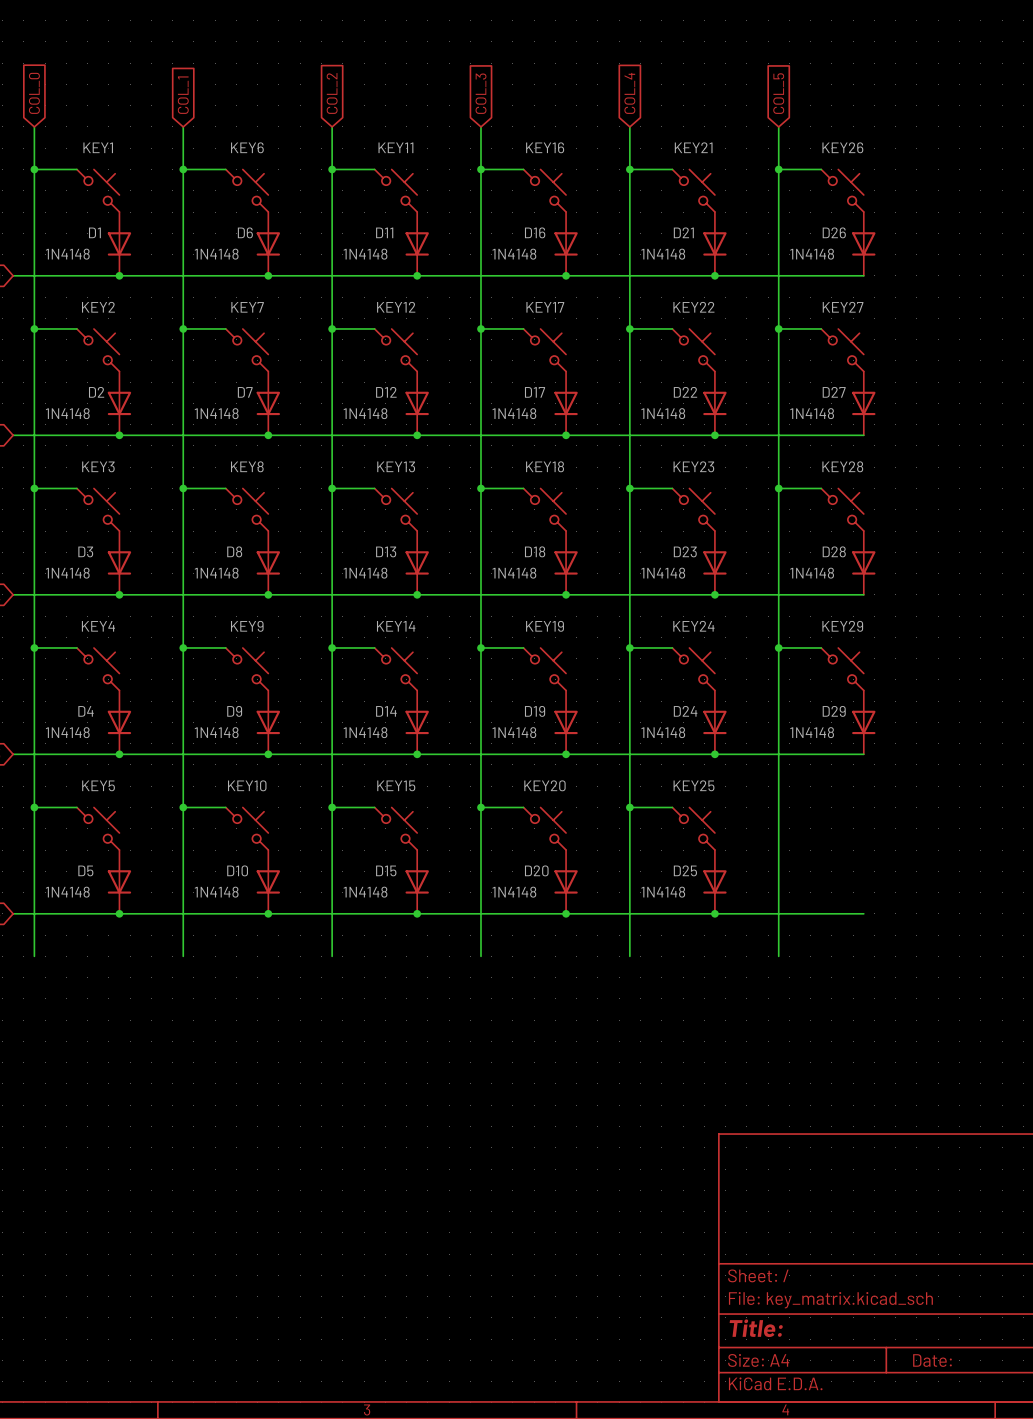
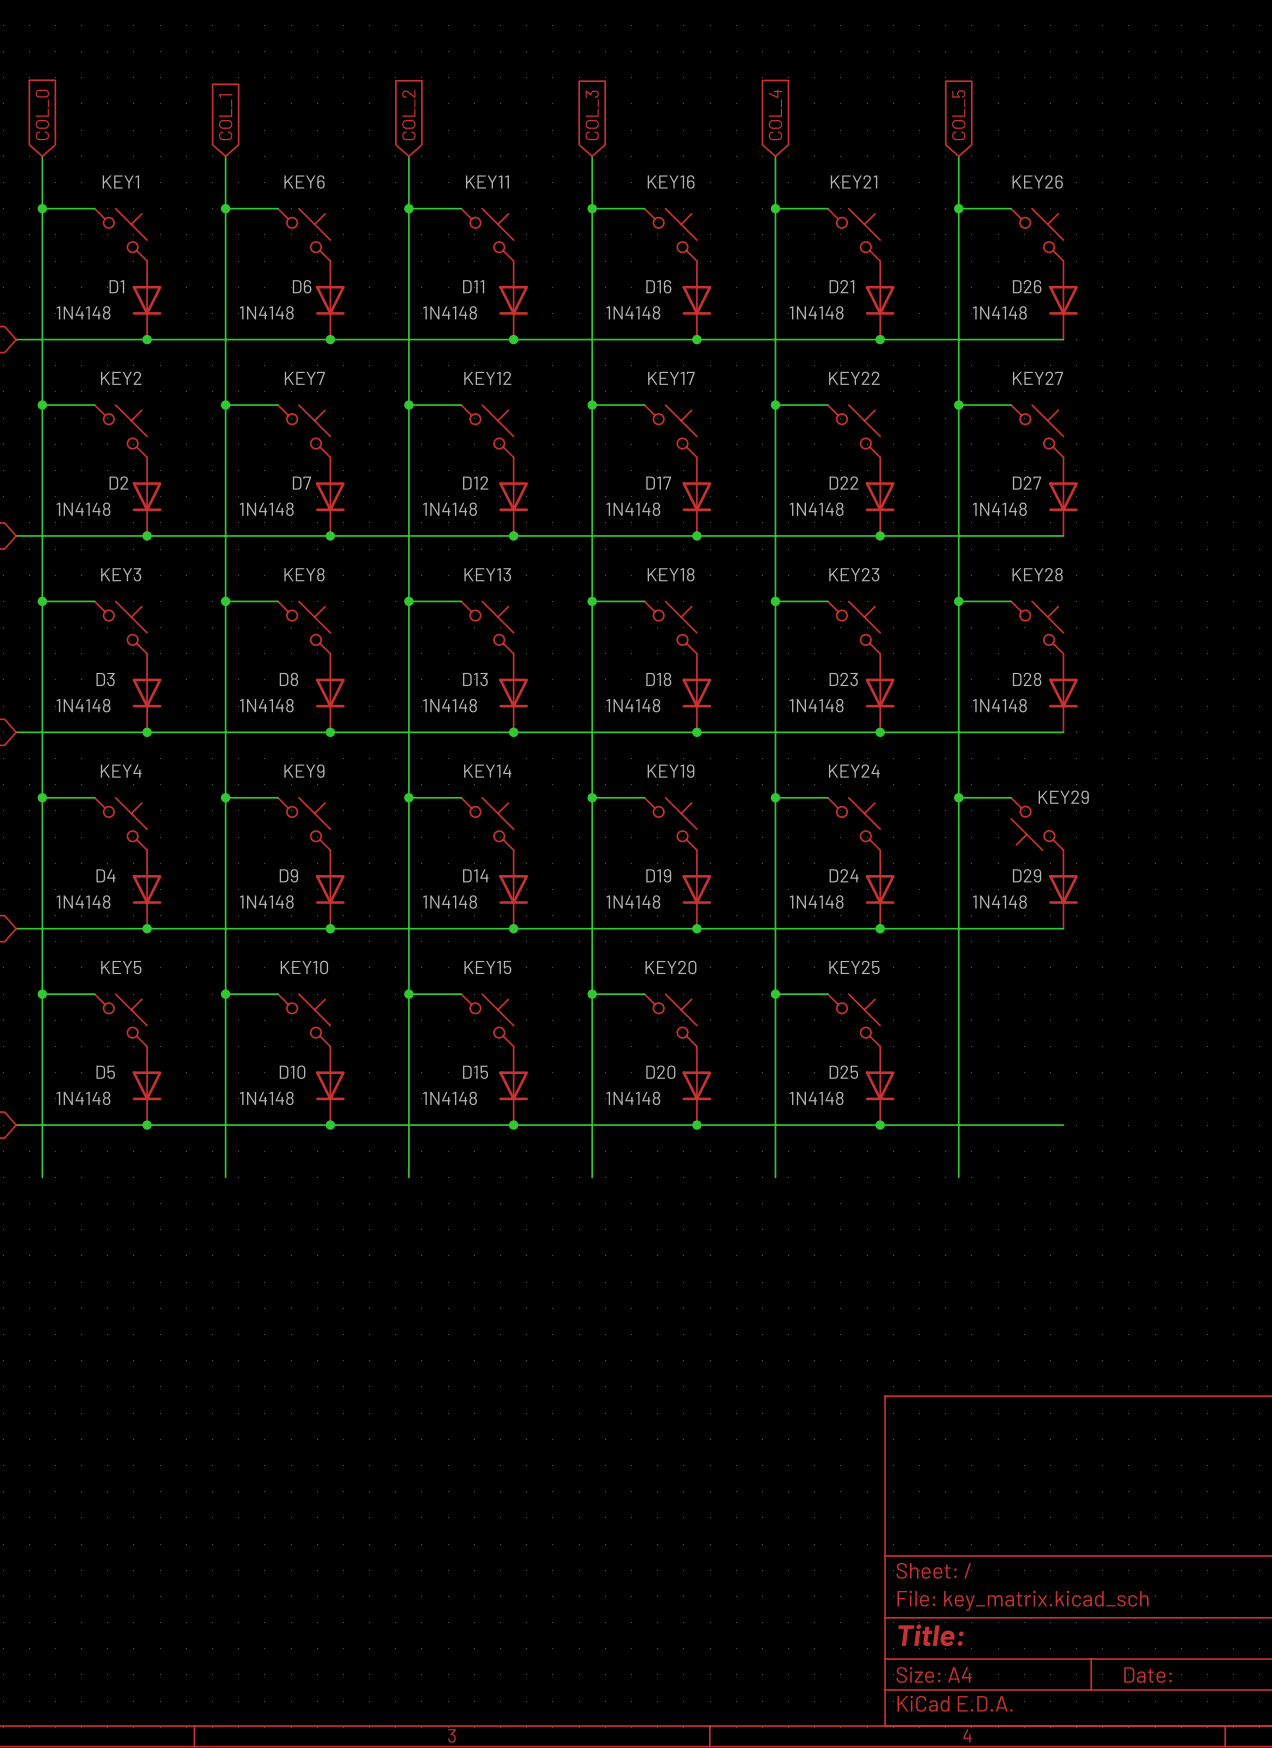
KEY29 name position: KEY29 (842, 626) -> KEY29 (1063, 797)
KEY29 rotation: 0° (842, 669) -> 180° (1037, 823)

